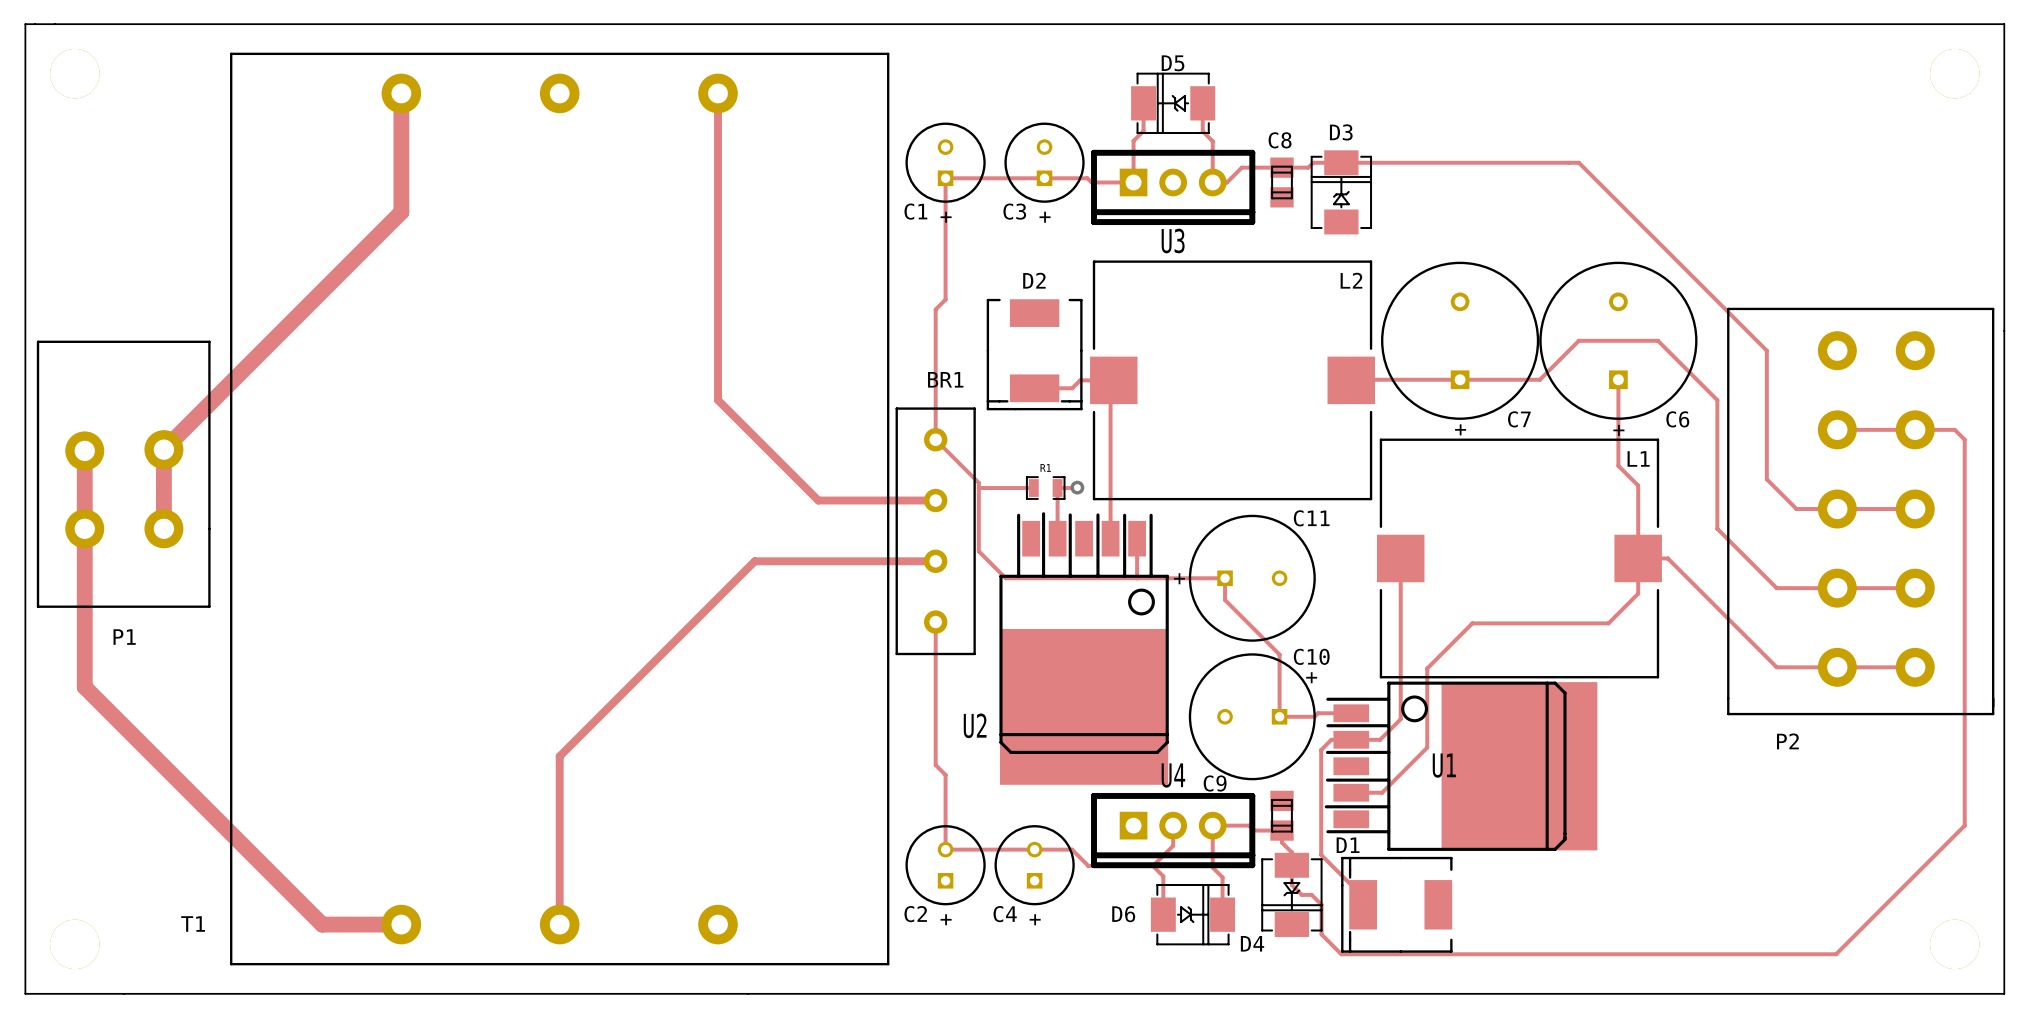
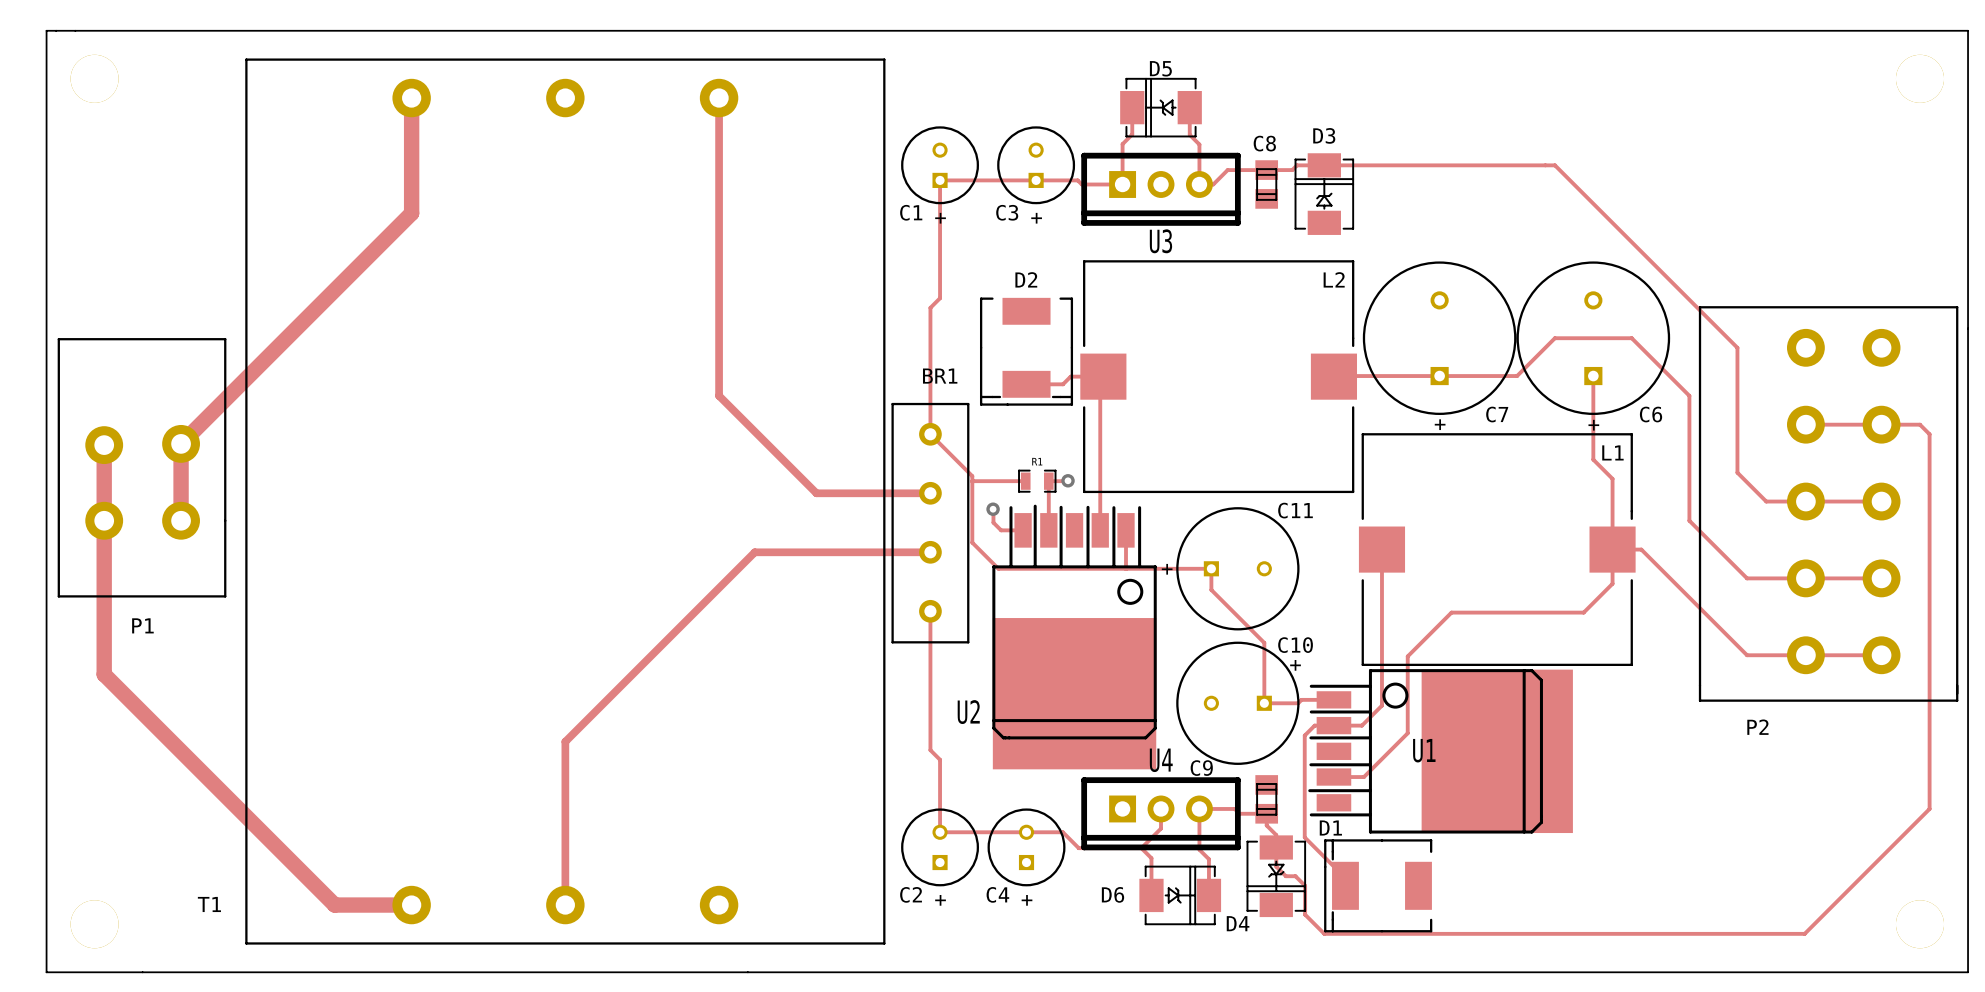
track: none -> (993, 509) (993, 522) (1001, 530) (1023, 530)
via: none -> (993, 509)

